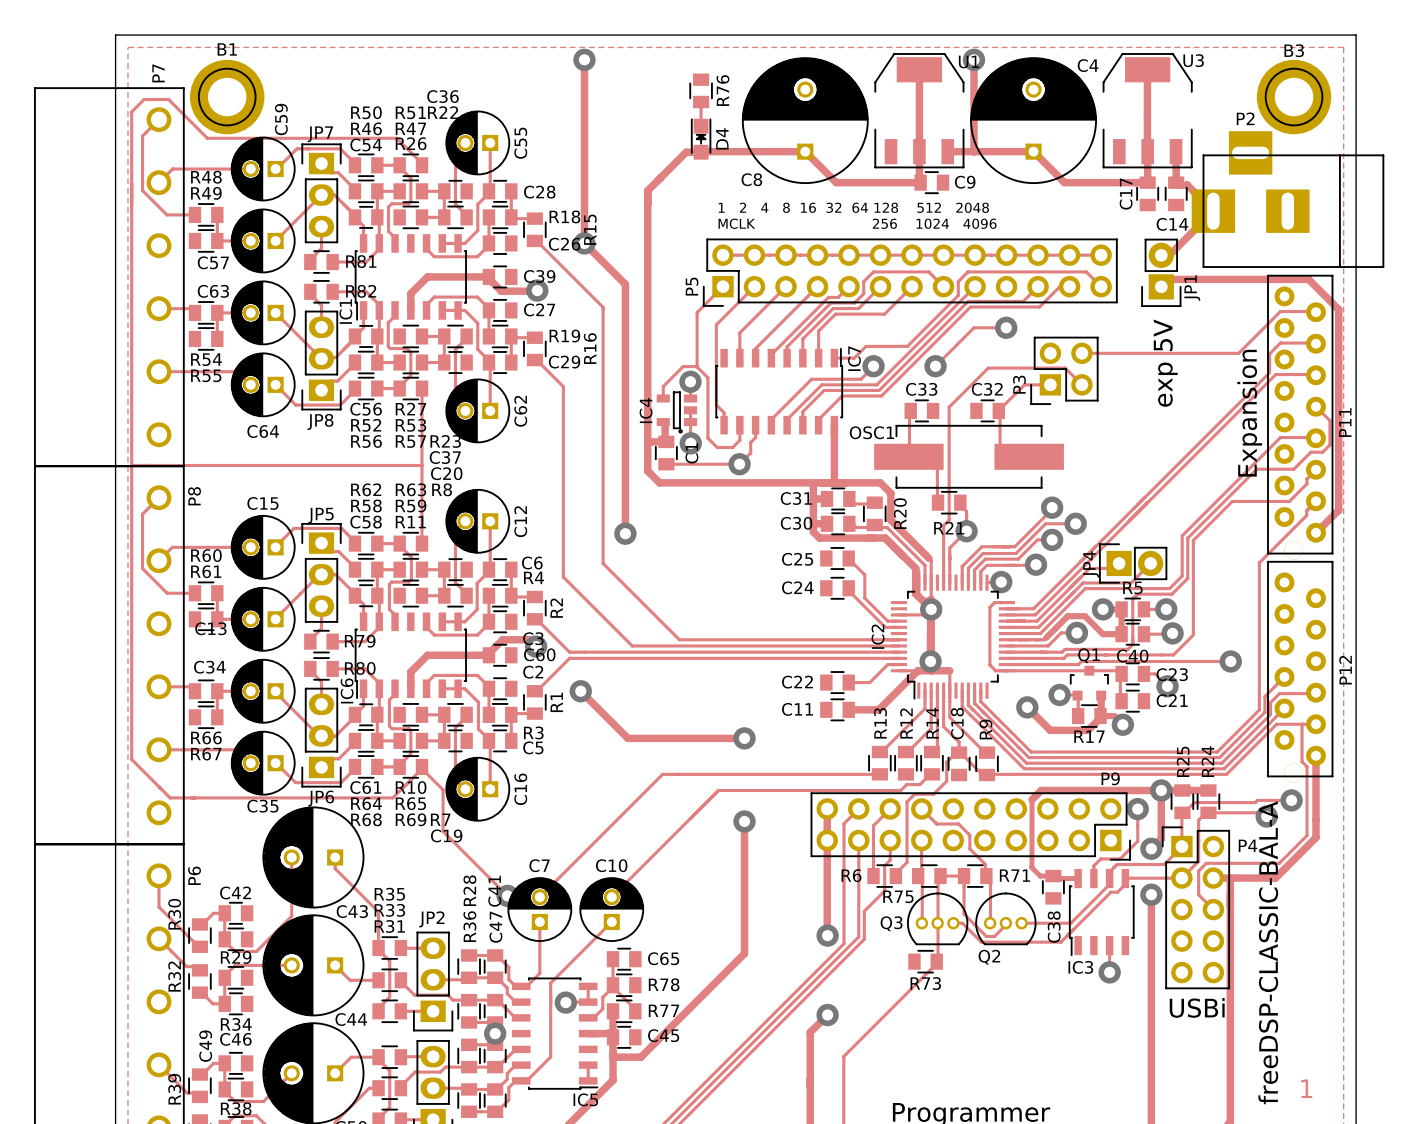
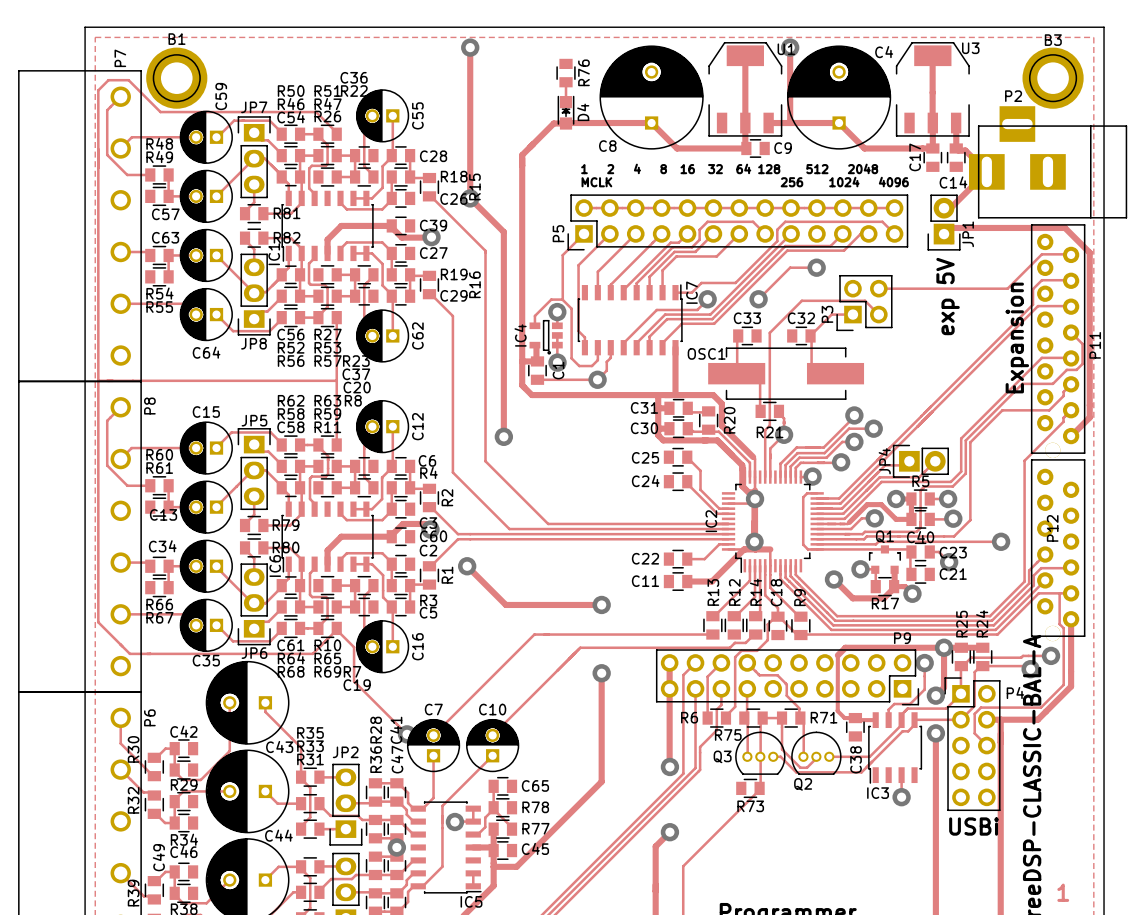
P12 name position: P12 (1345, 670) -> P12 (1052, 528)

